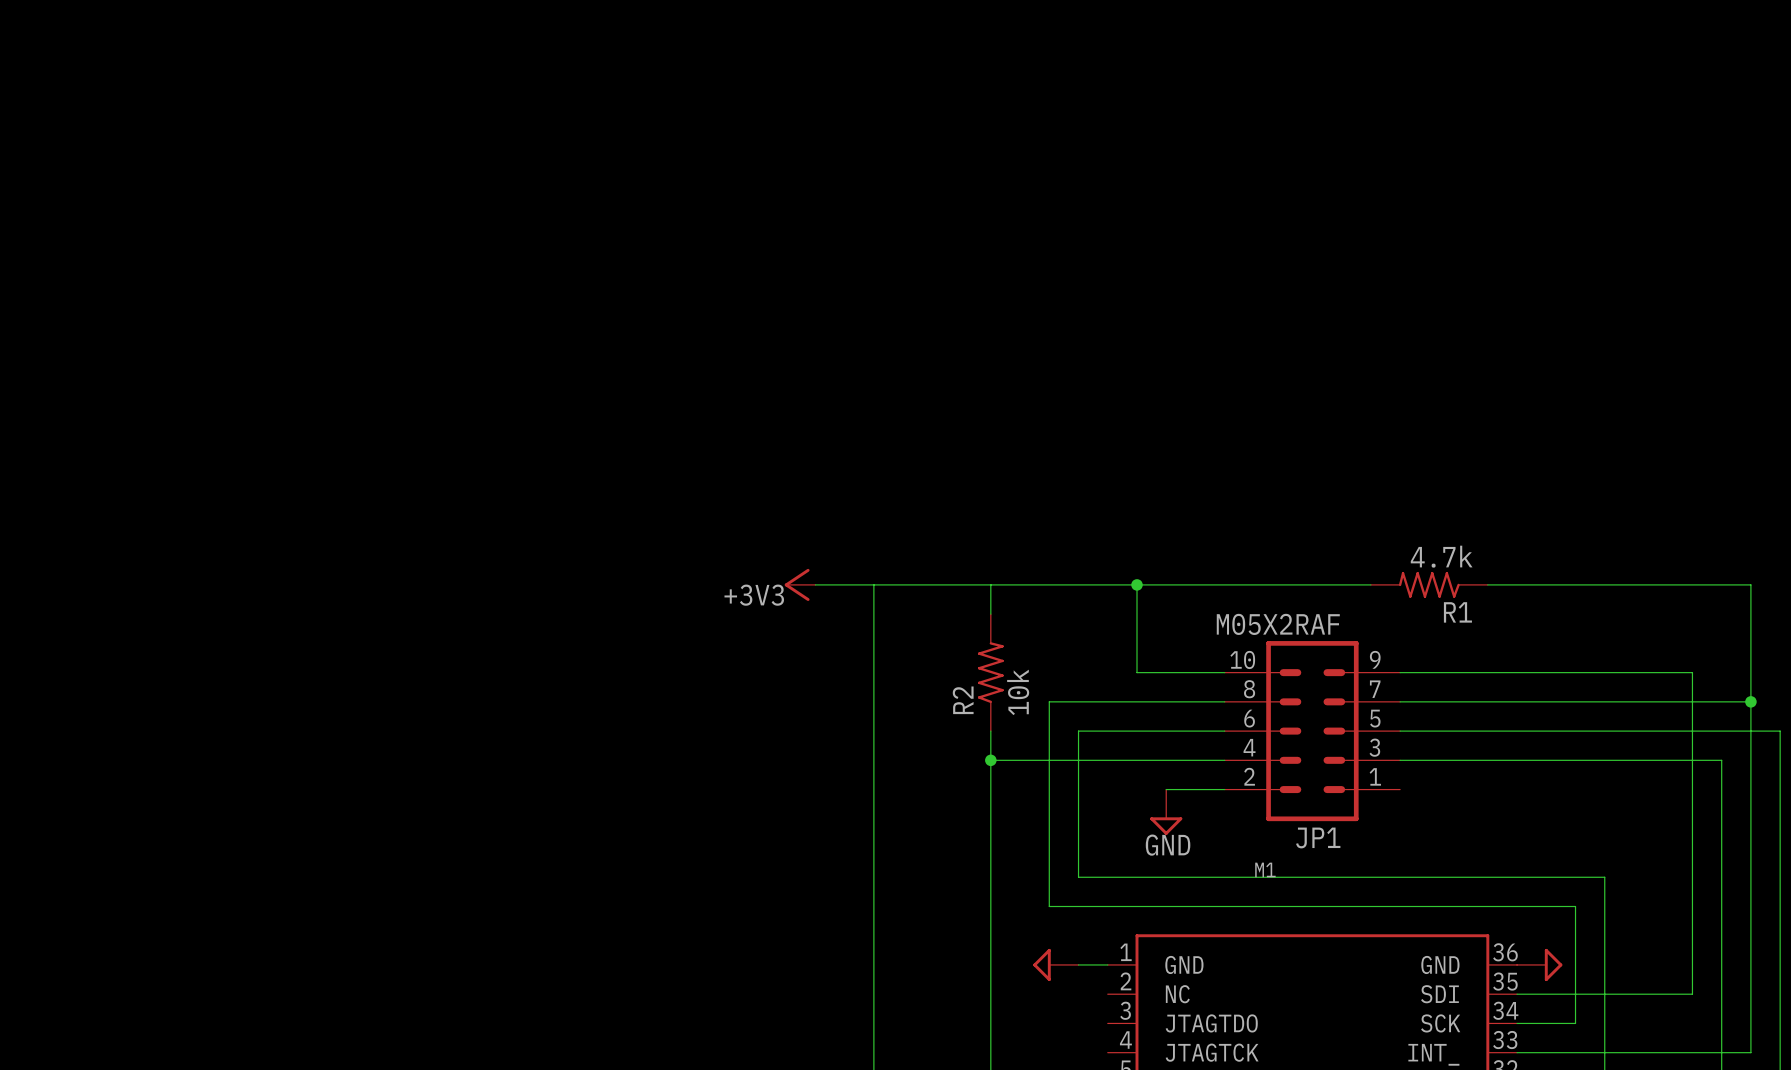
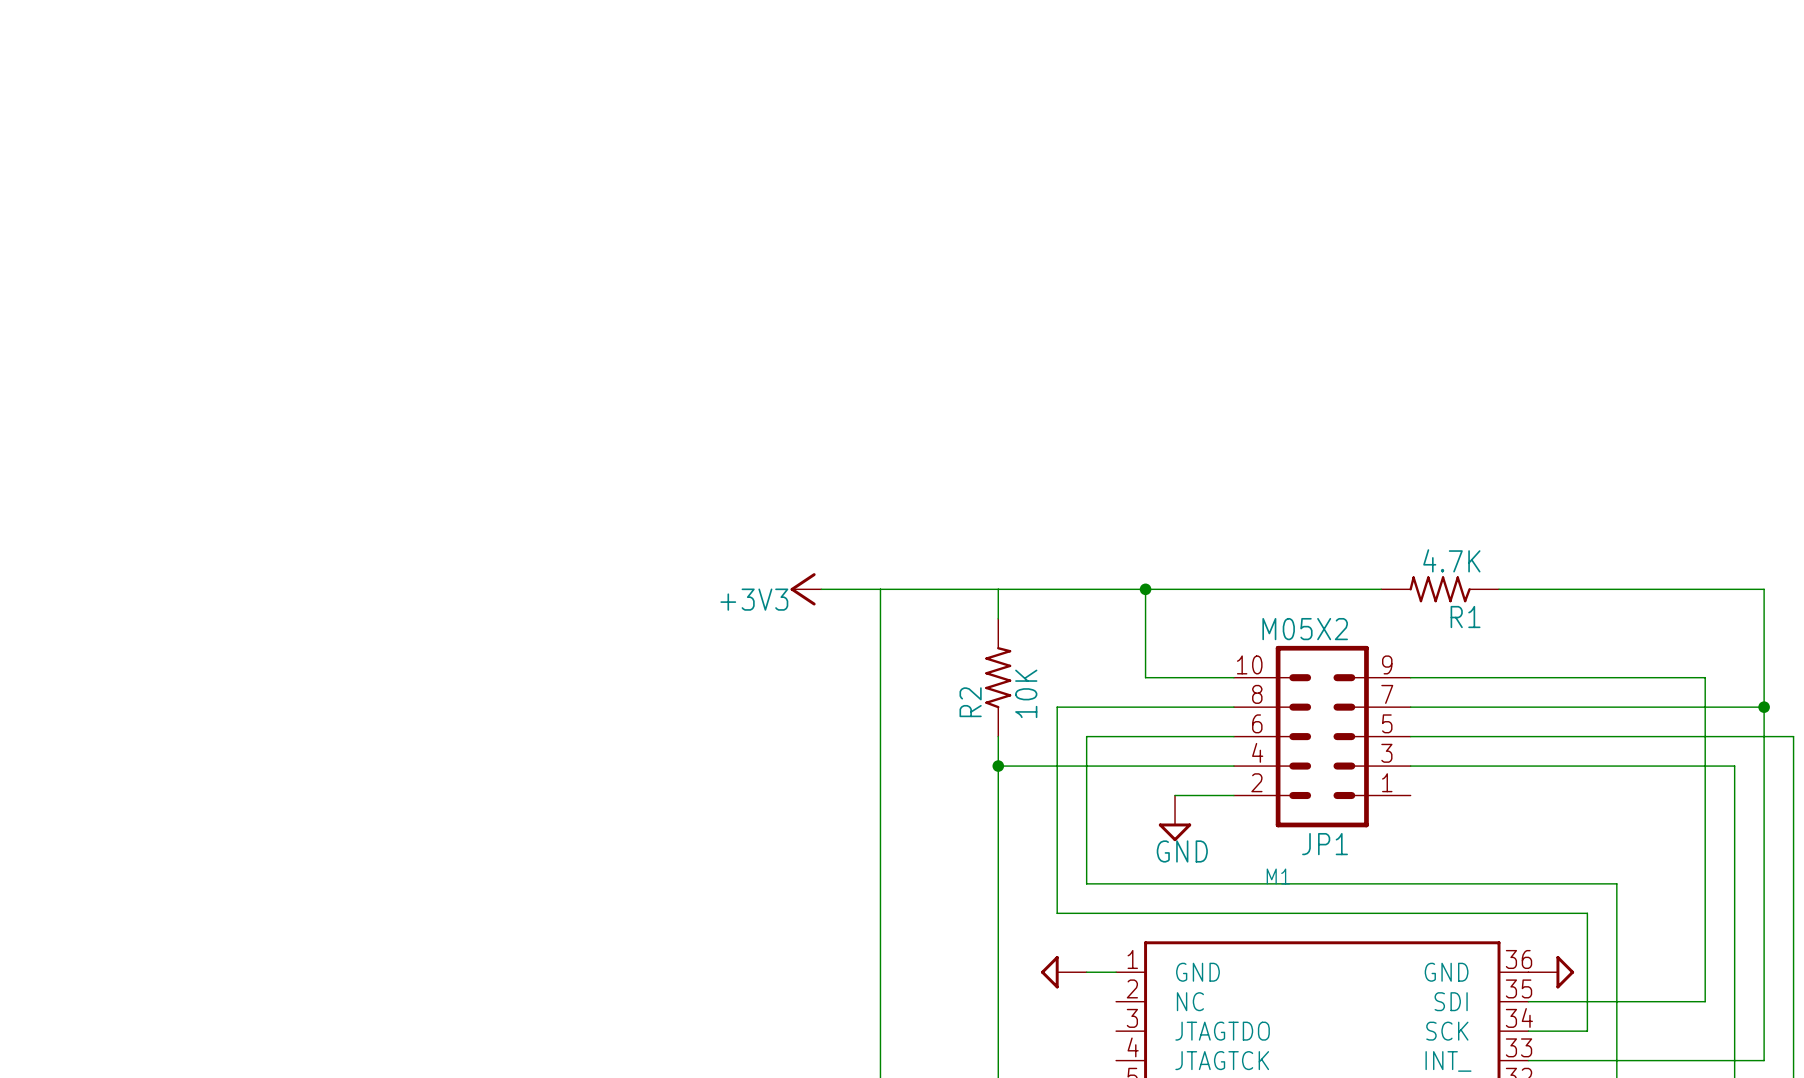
R1 value: 4.7k (1441, 556) -> 4.7K (1451, 560)
JP1 value: M05X2RAF (1278, 624) -> M05X2 (1305, 629)
R2 value: 10k (1018, 692) -> 10K (1026, 693)

